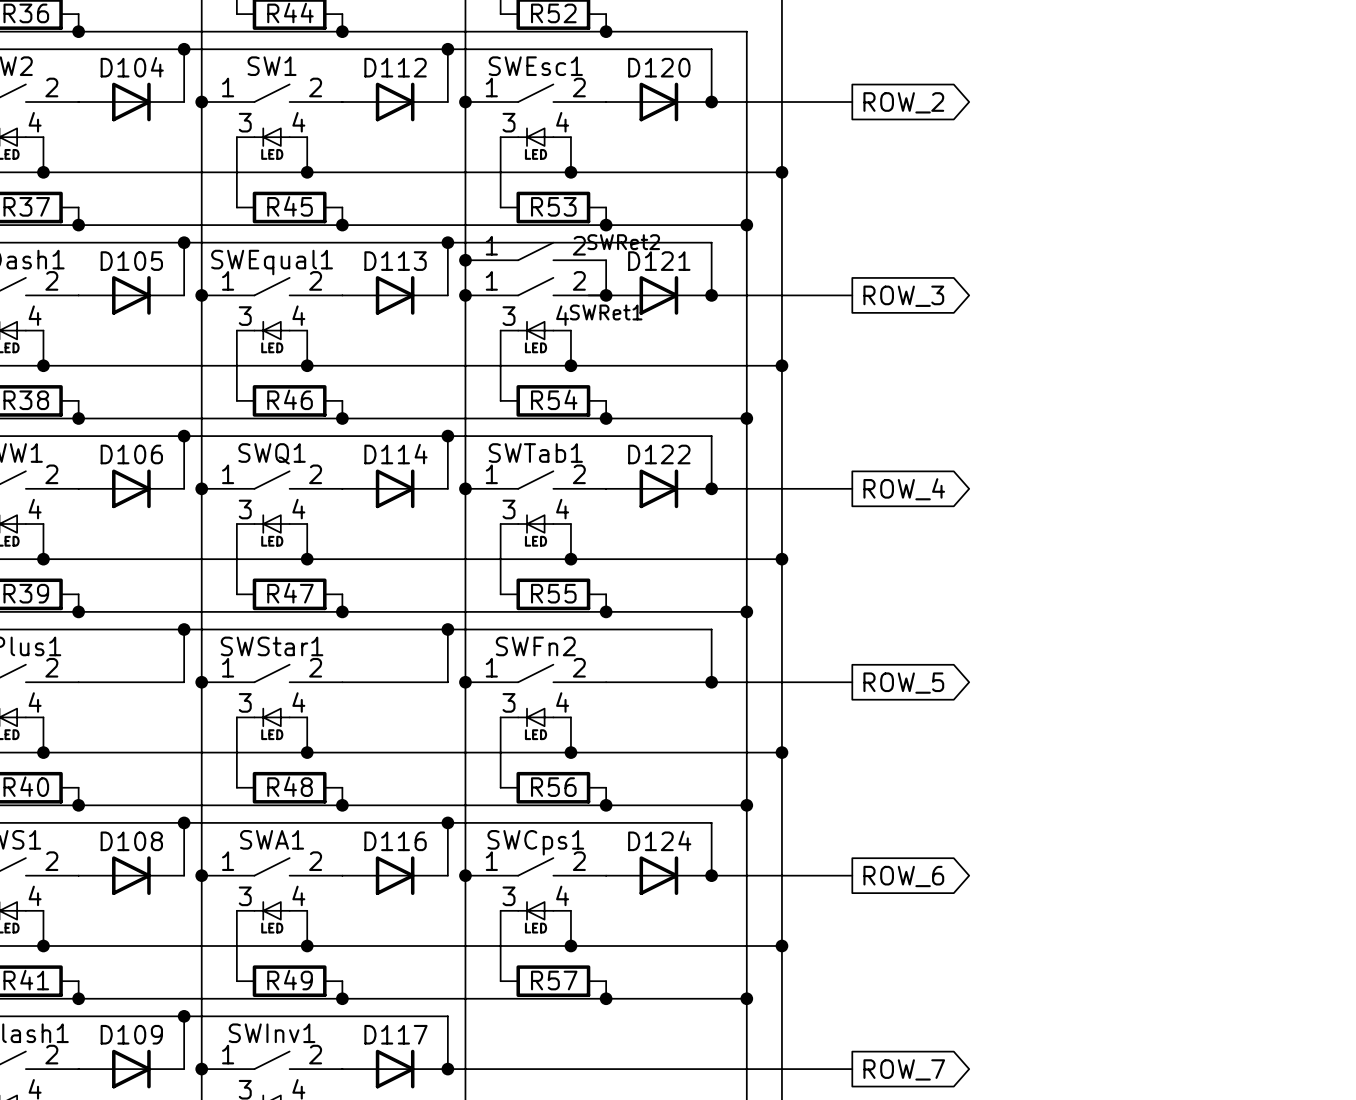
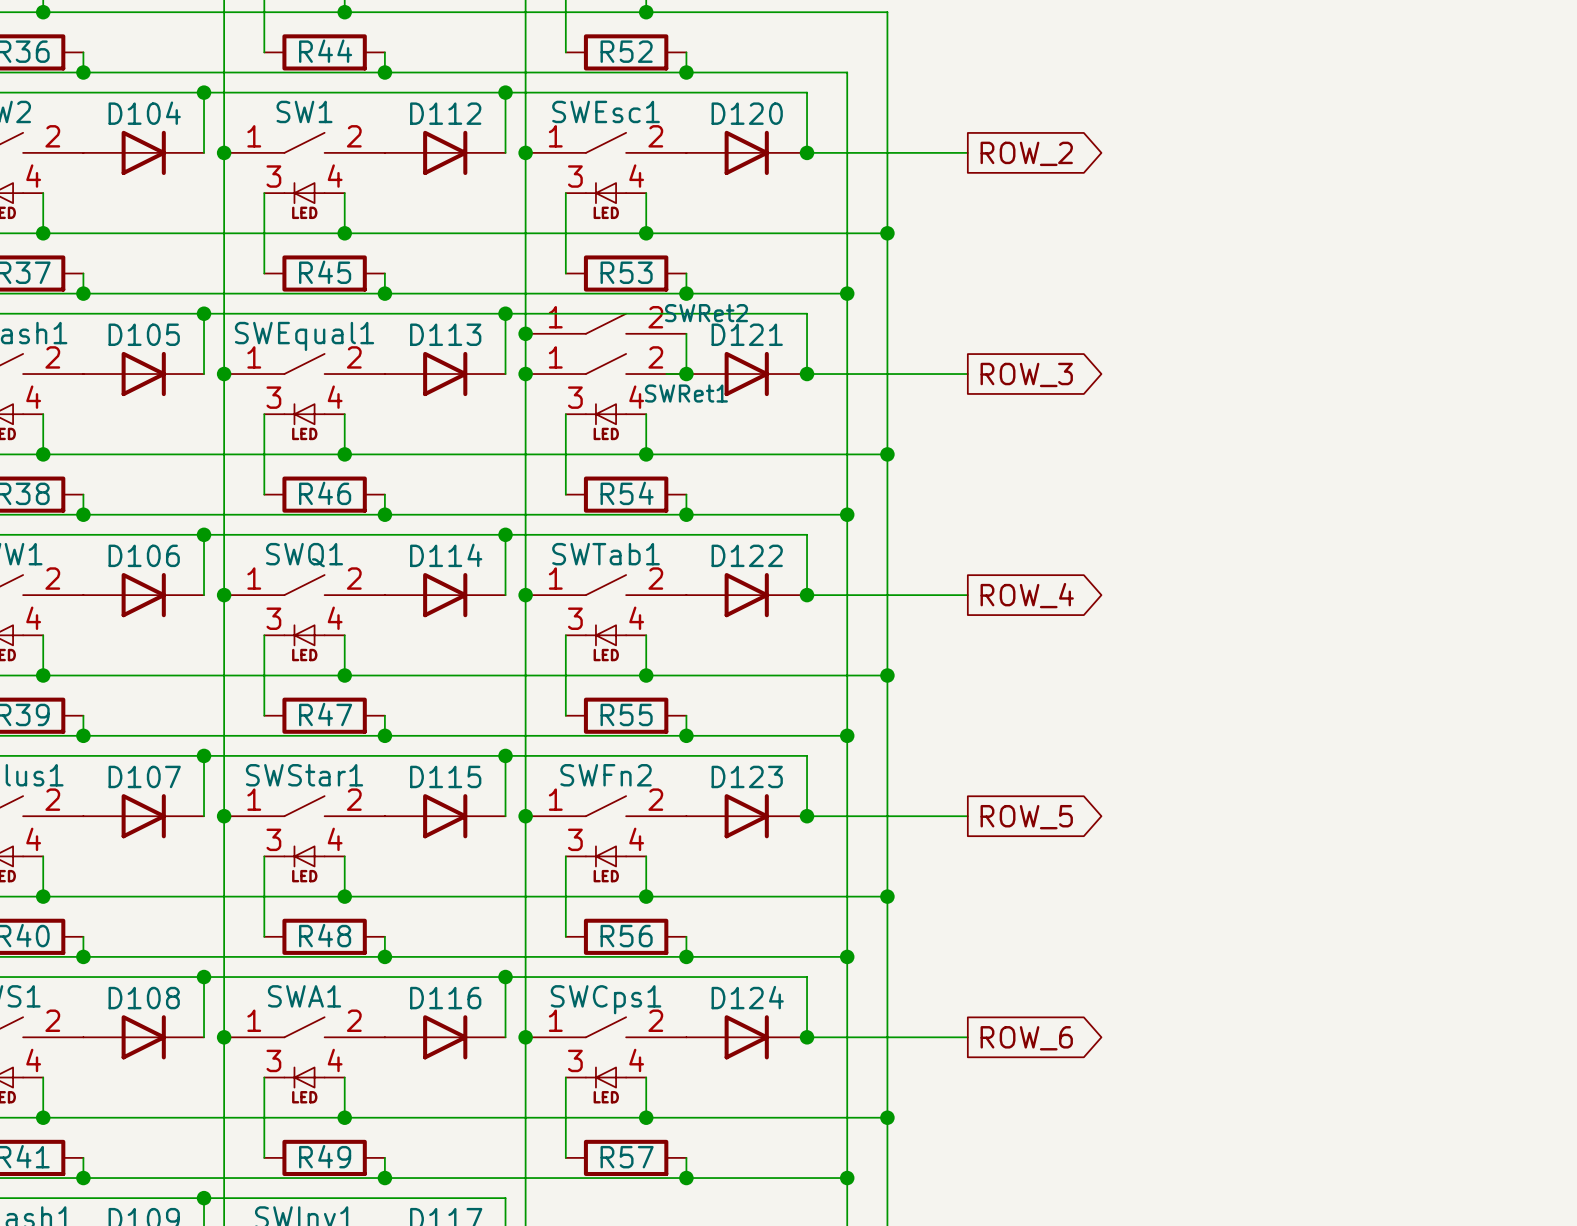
D107: none -> (143, 816)
D115: none -> (445, 816)
D123: none -> (746, 816)

